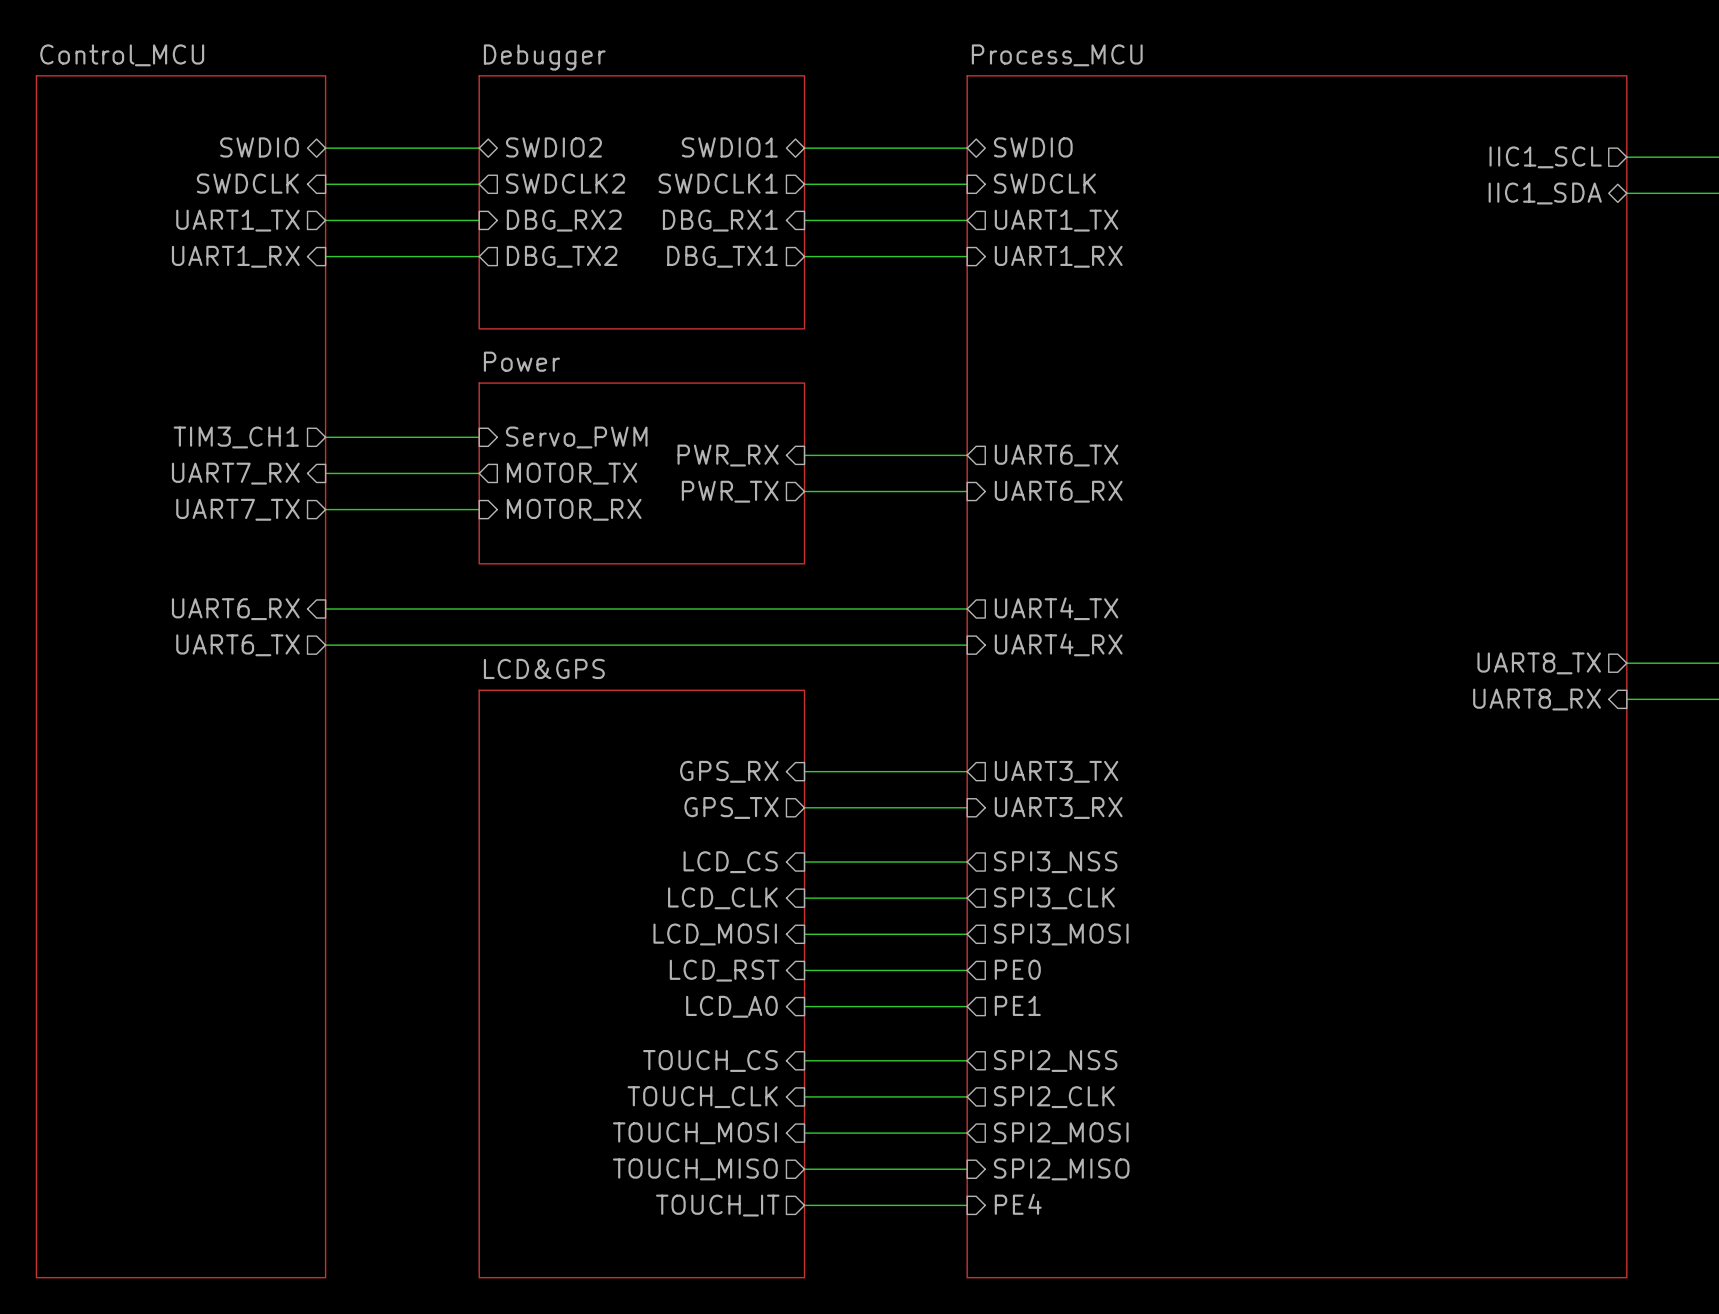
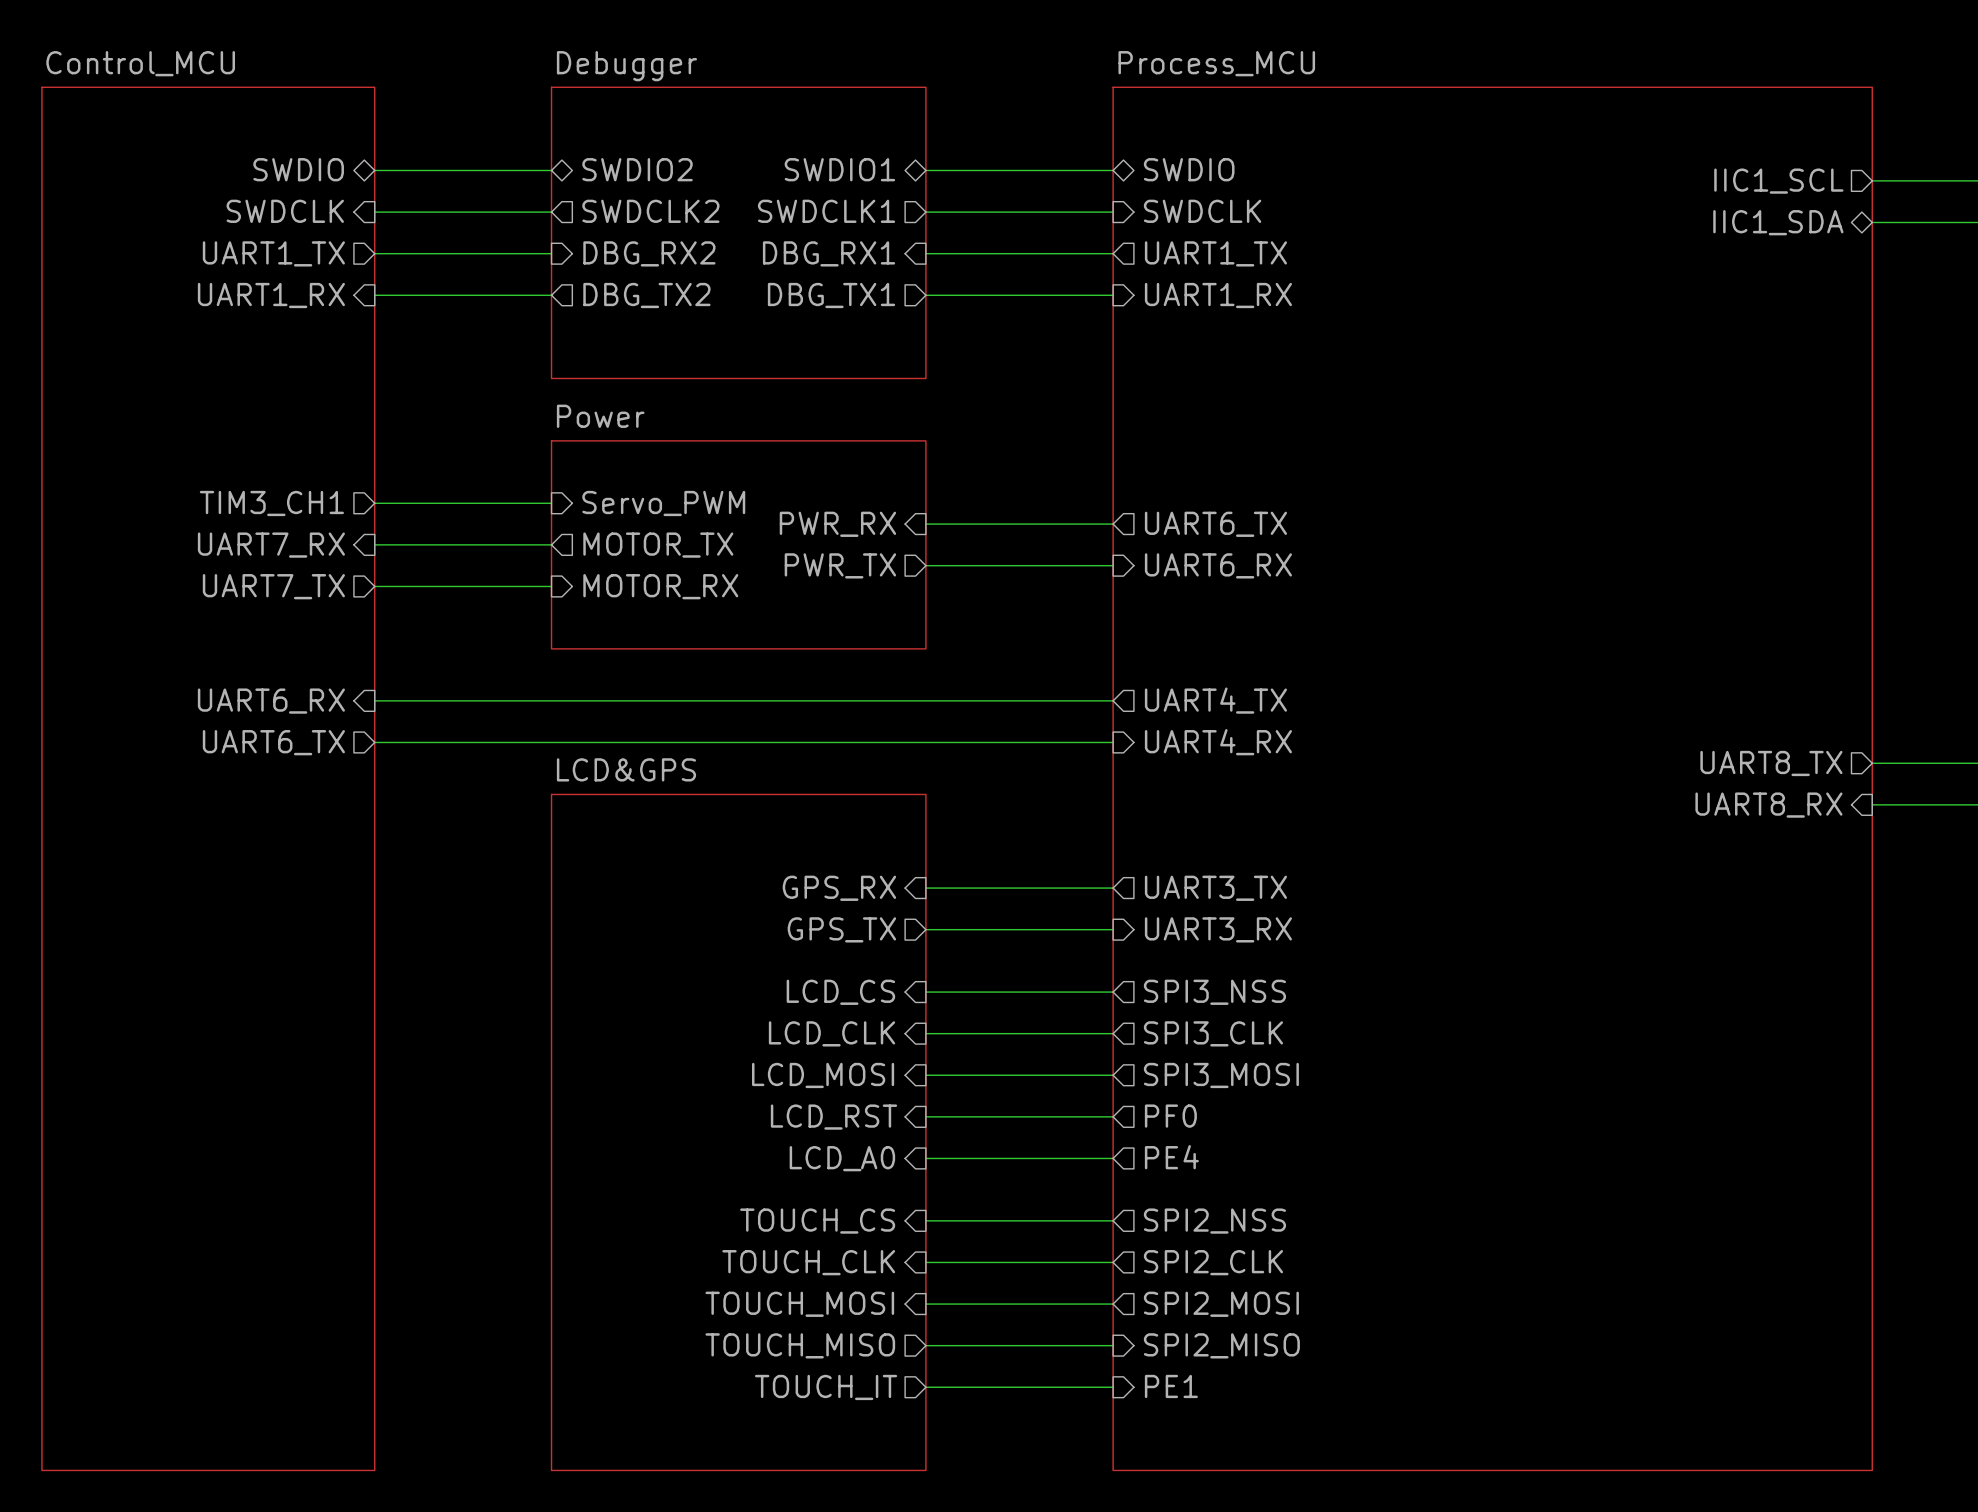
sheet pin: PE0 (1017, 969) -> PF0 (1170, 1116)
sheet pin: PE1 (1017, 1005) -> PE4 (1171, 1157)
sheet pin: PE4 (1018, 1204) -> PE1 (1171, 1386)

